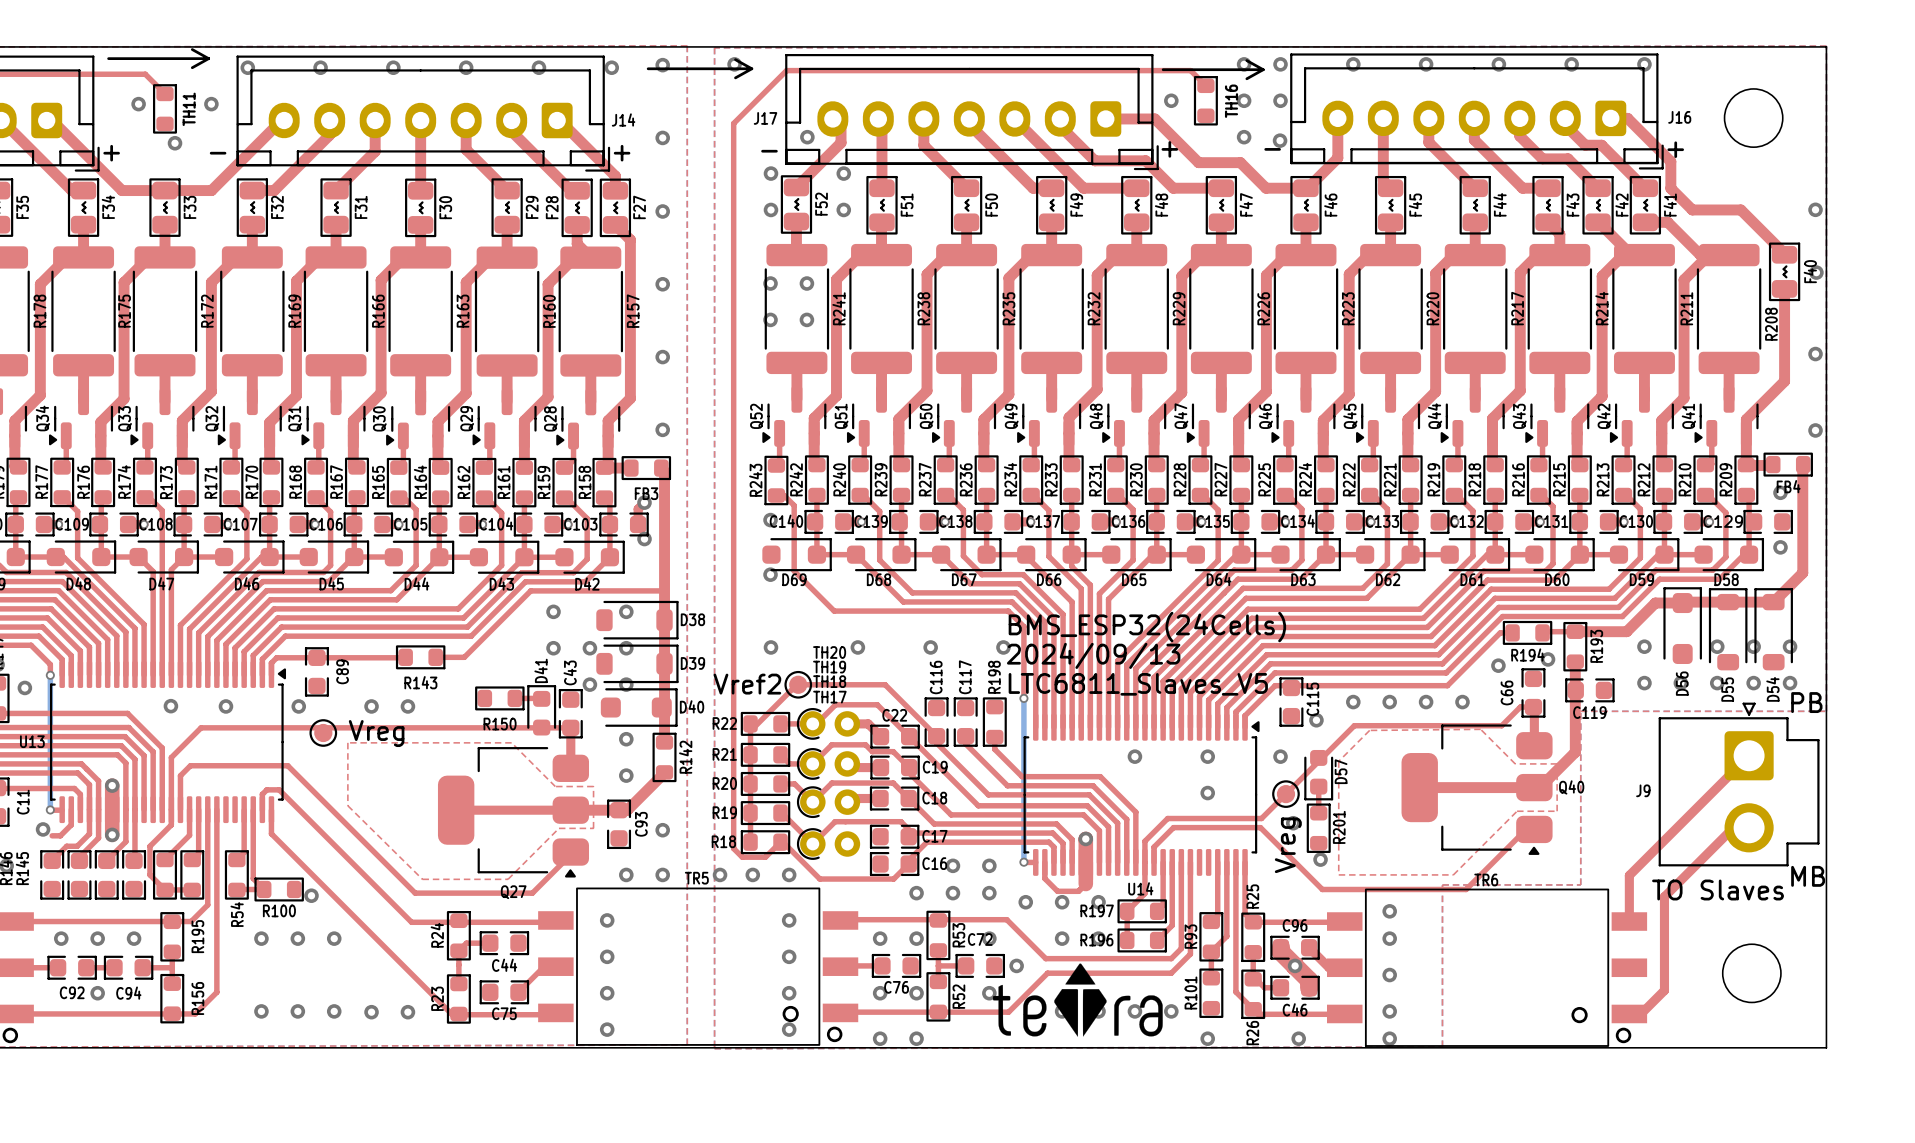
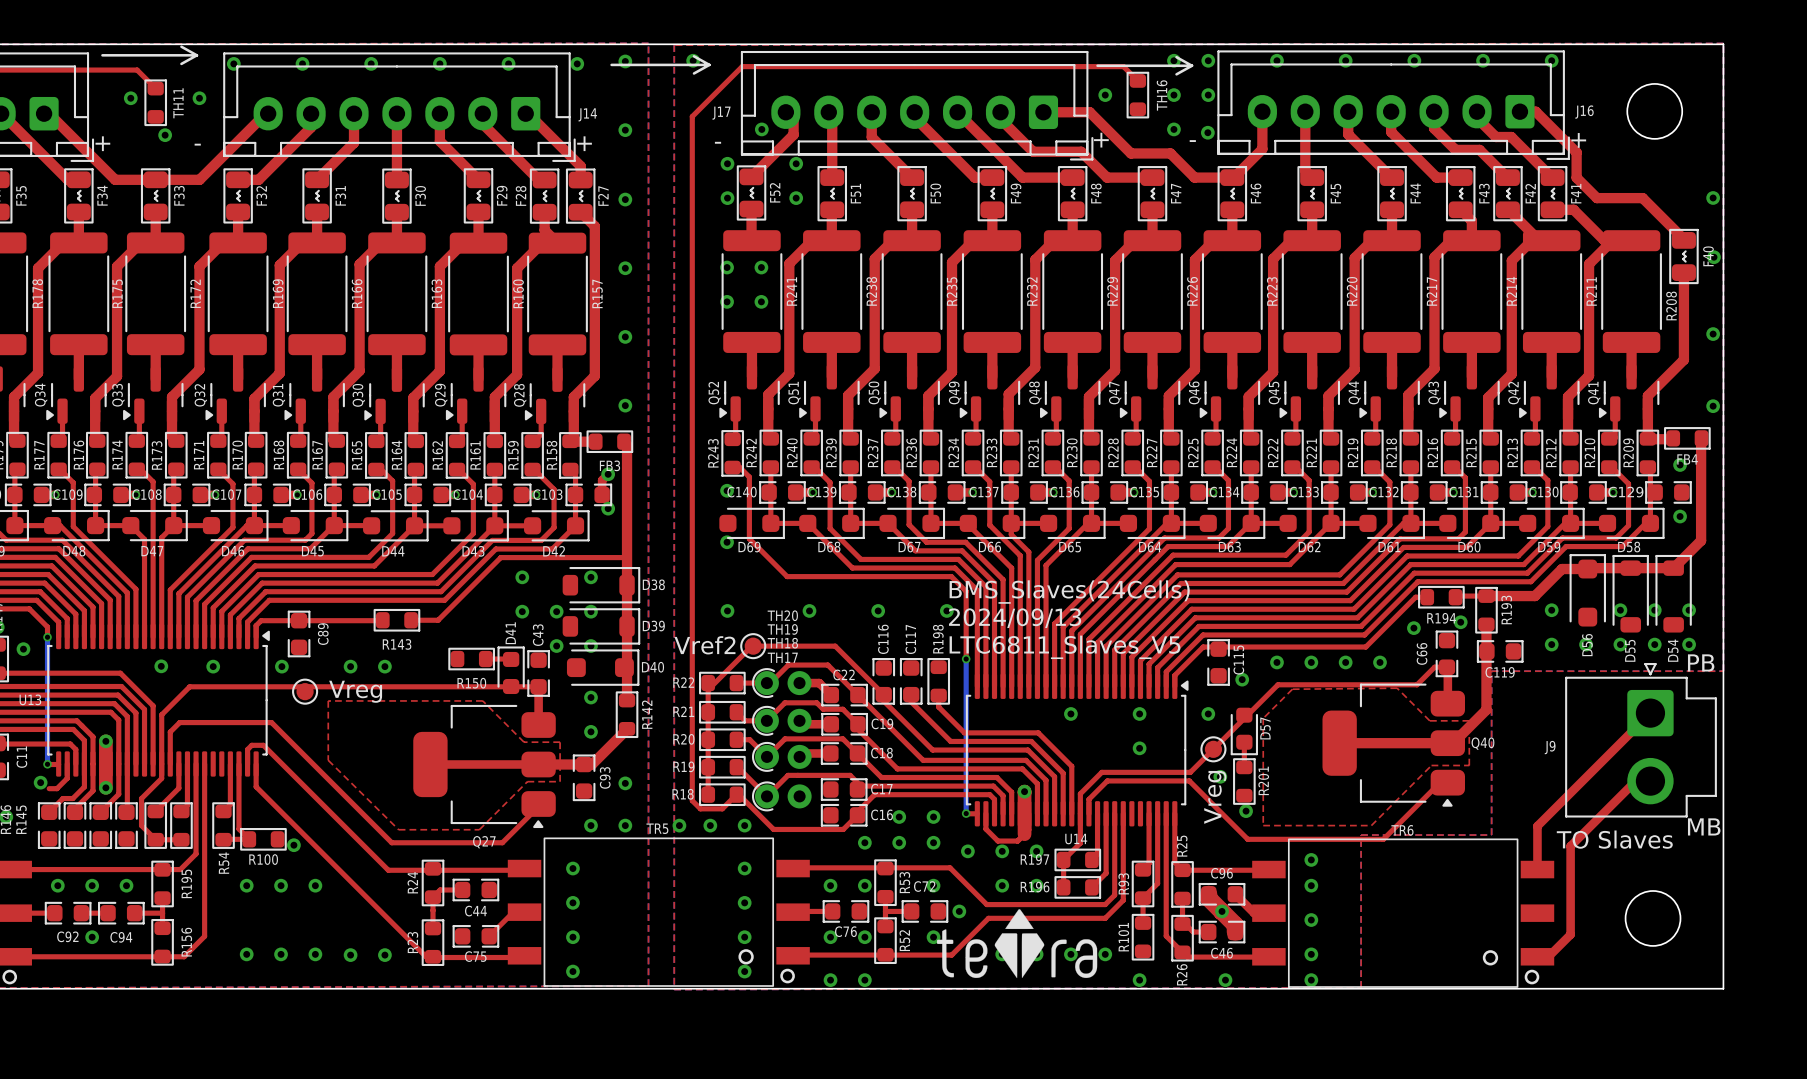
text: BMS_ESP32(24Cells) (1147, 627) -> BMS_Slaves(24Cells) (1069, 592)

